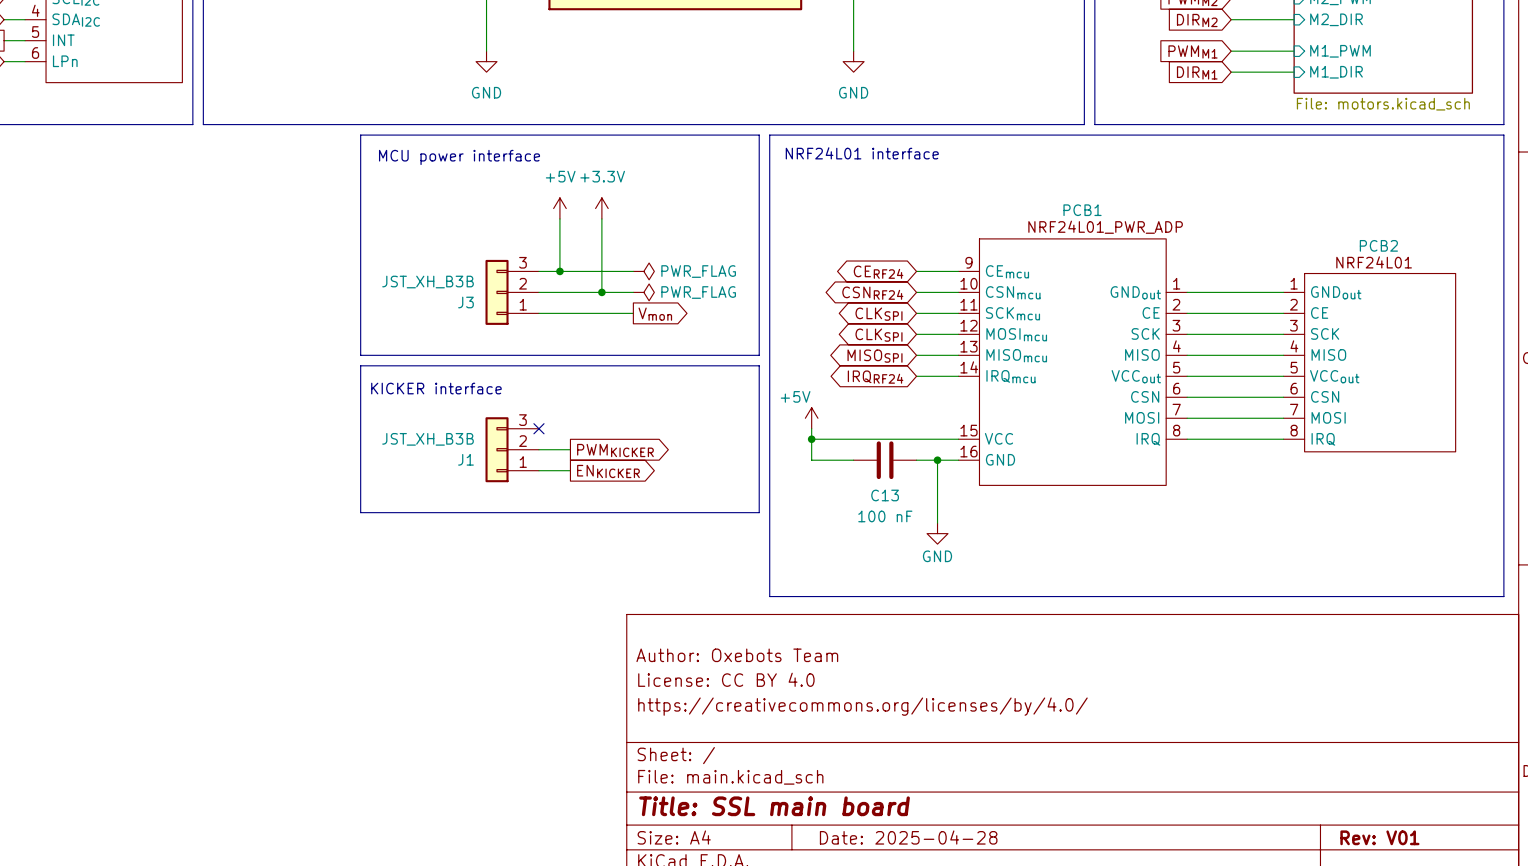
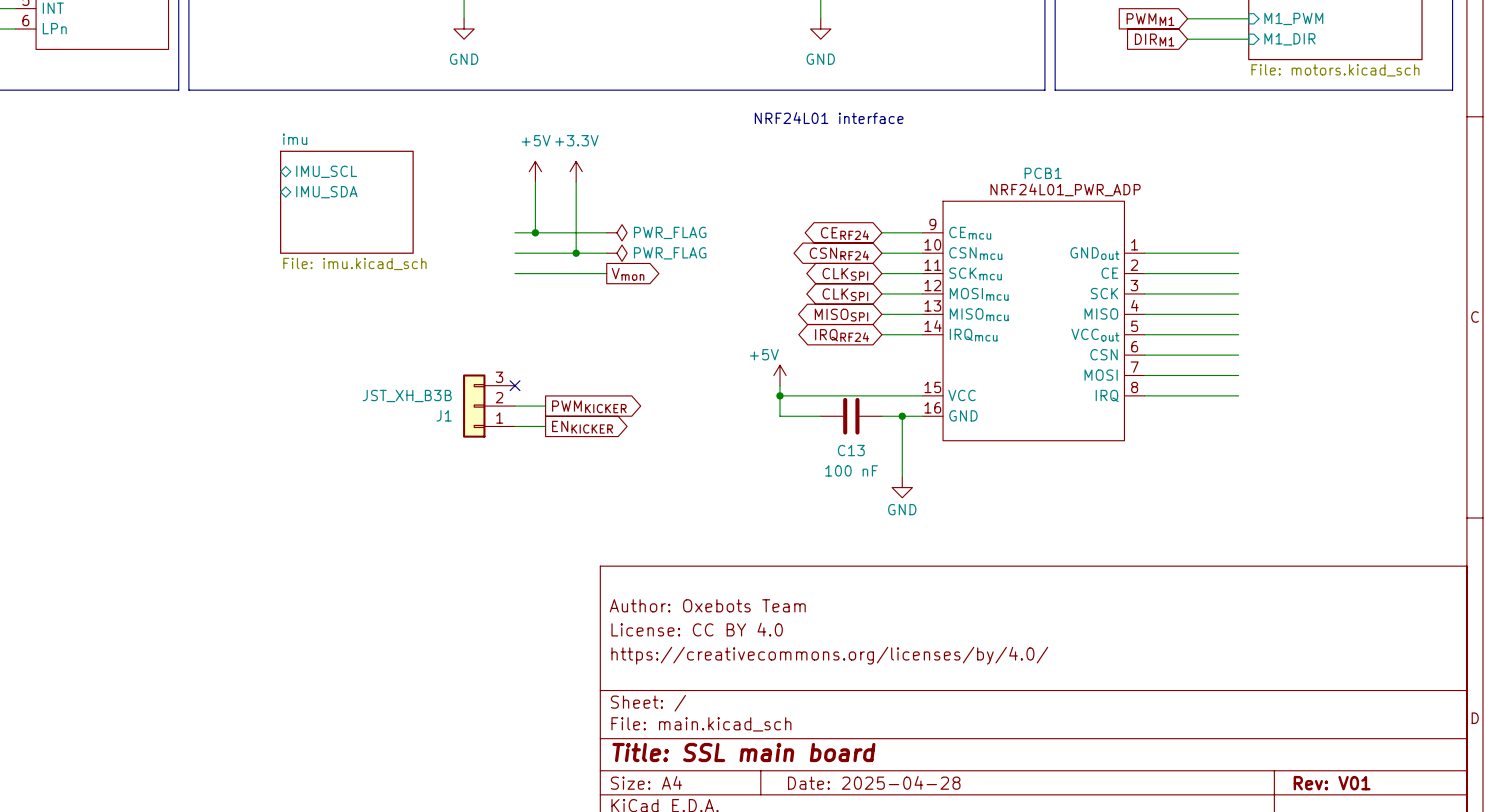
line: (360, 135) (759, 135) (759, 355) (360, 355) (360, 135) -> none
line: (769, 135) (1503, 135) (1503, 596) (769, 596) (769, 135) -> none
text: MCU power interface (459, 157) -> none
sheet pin: none -> IMU_SCL (326, 171)
sheet pin: none -> IMU_SDA (326, 192)
sheet imu: none -> File: imu.kicad_sch (346, 202)
J3: JST_XH_B3B (512, 292) -> none
PCB2: (1369, 362) -> none
line: (360, 365) (360, 512) (759, 512) (759, 365) (360, 365) -> none
text: KICKER interface (436, 388) -> none

